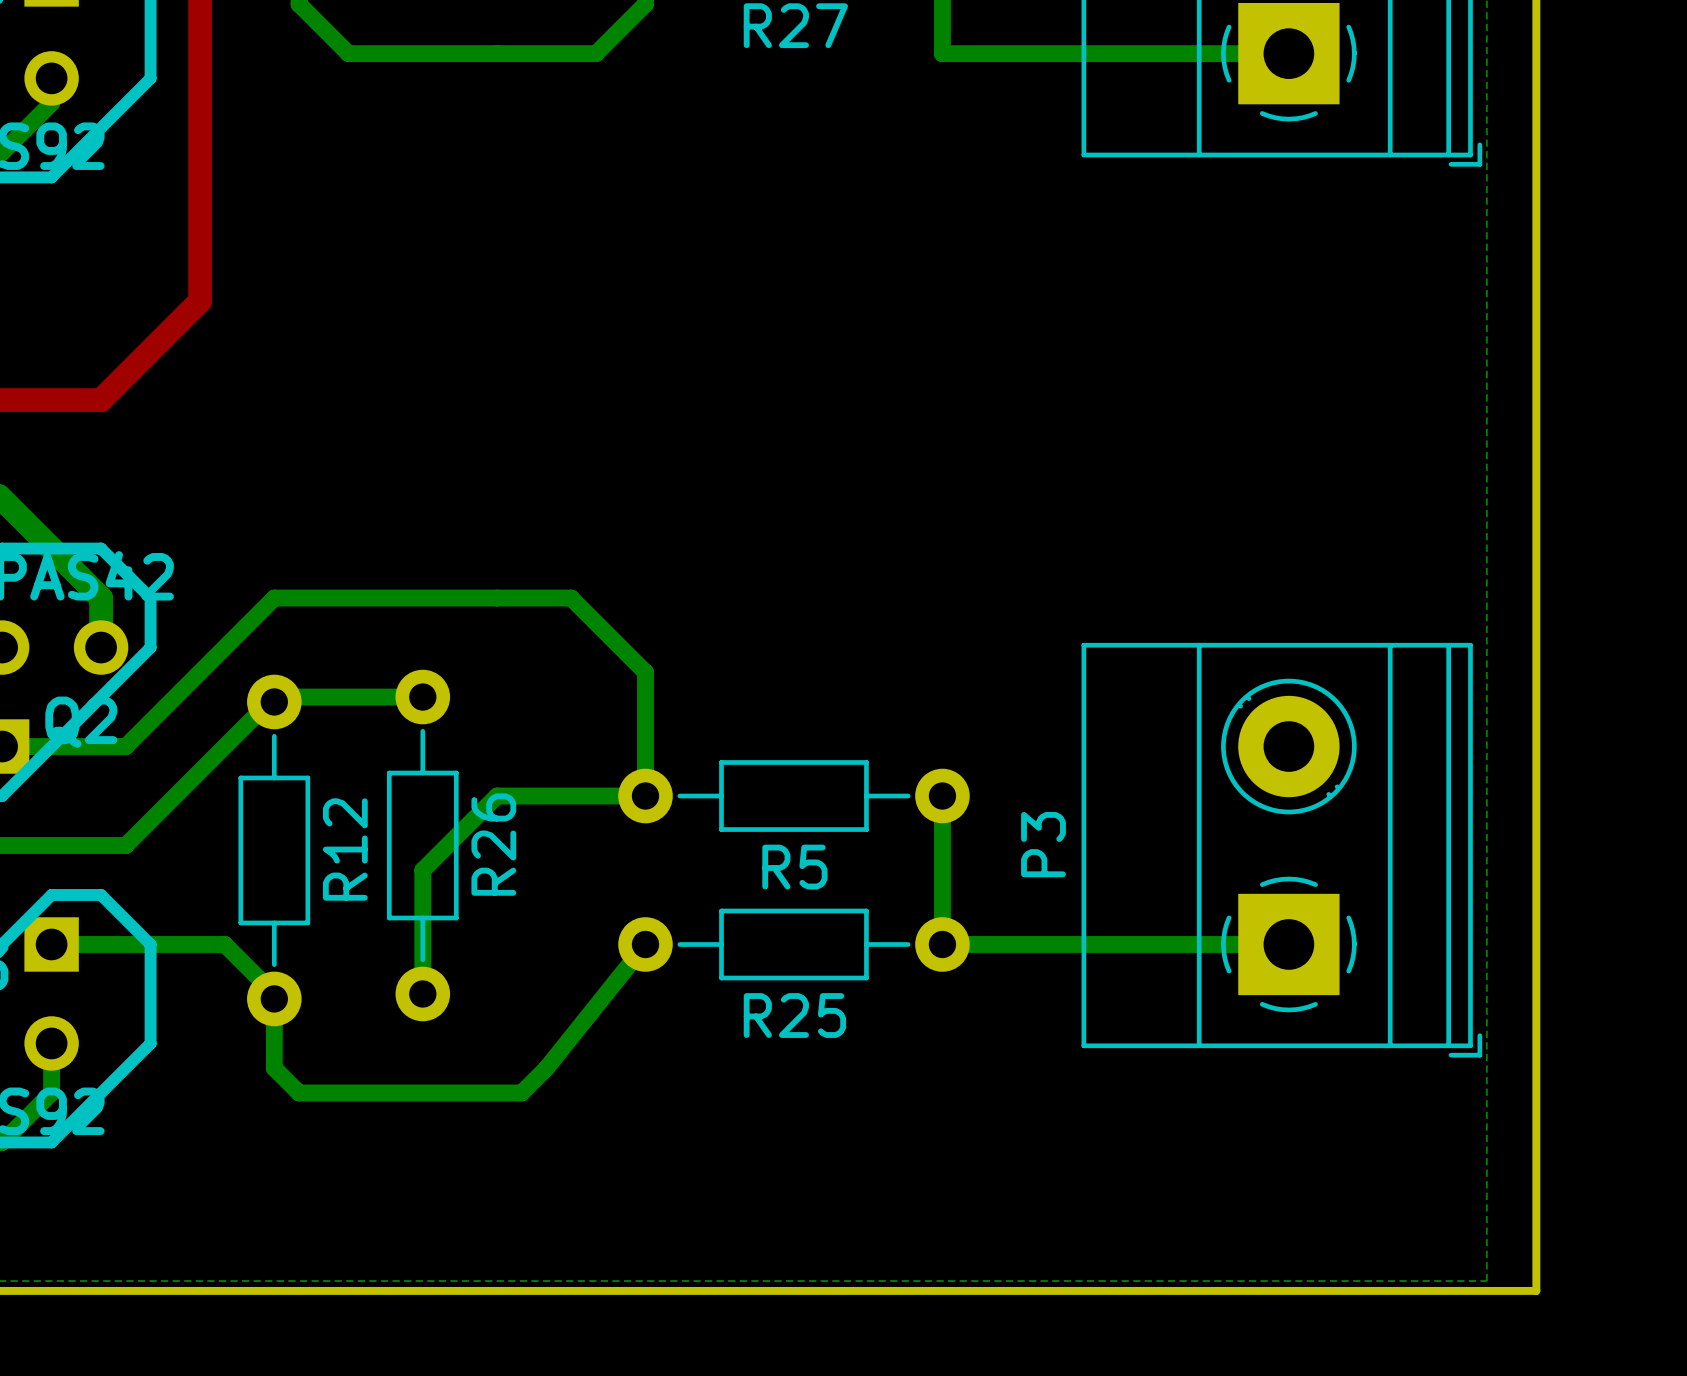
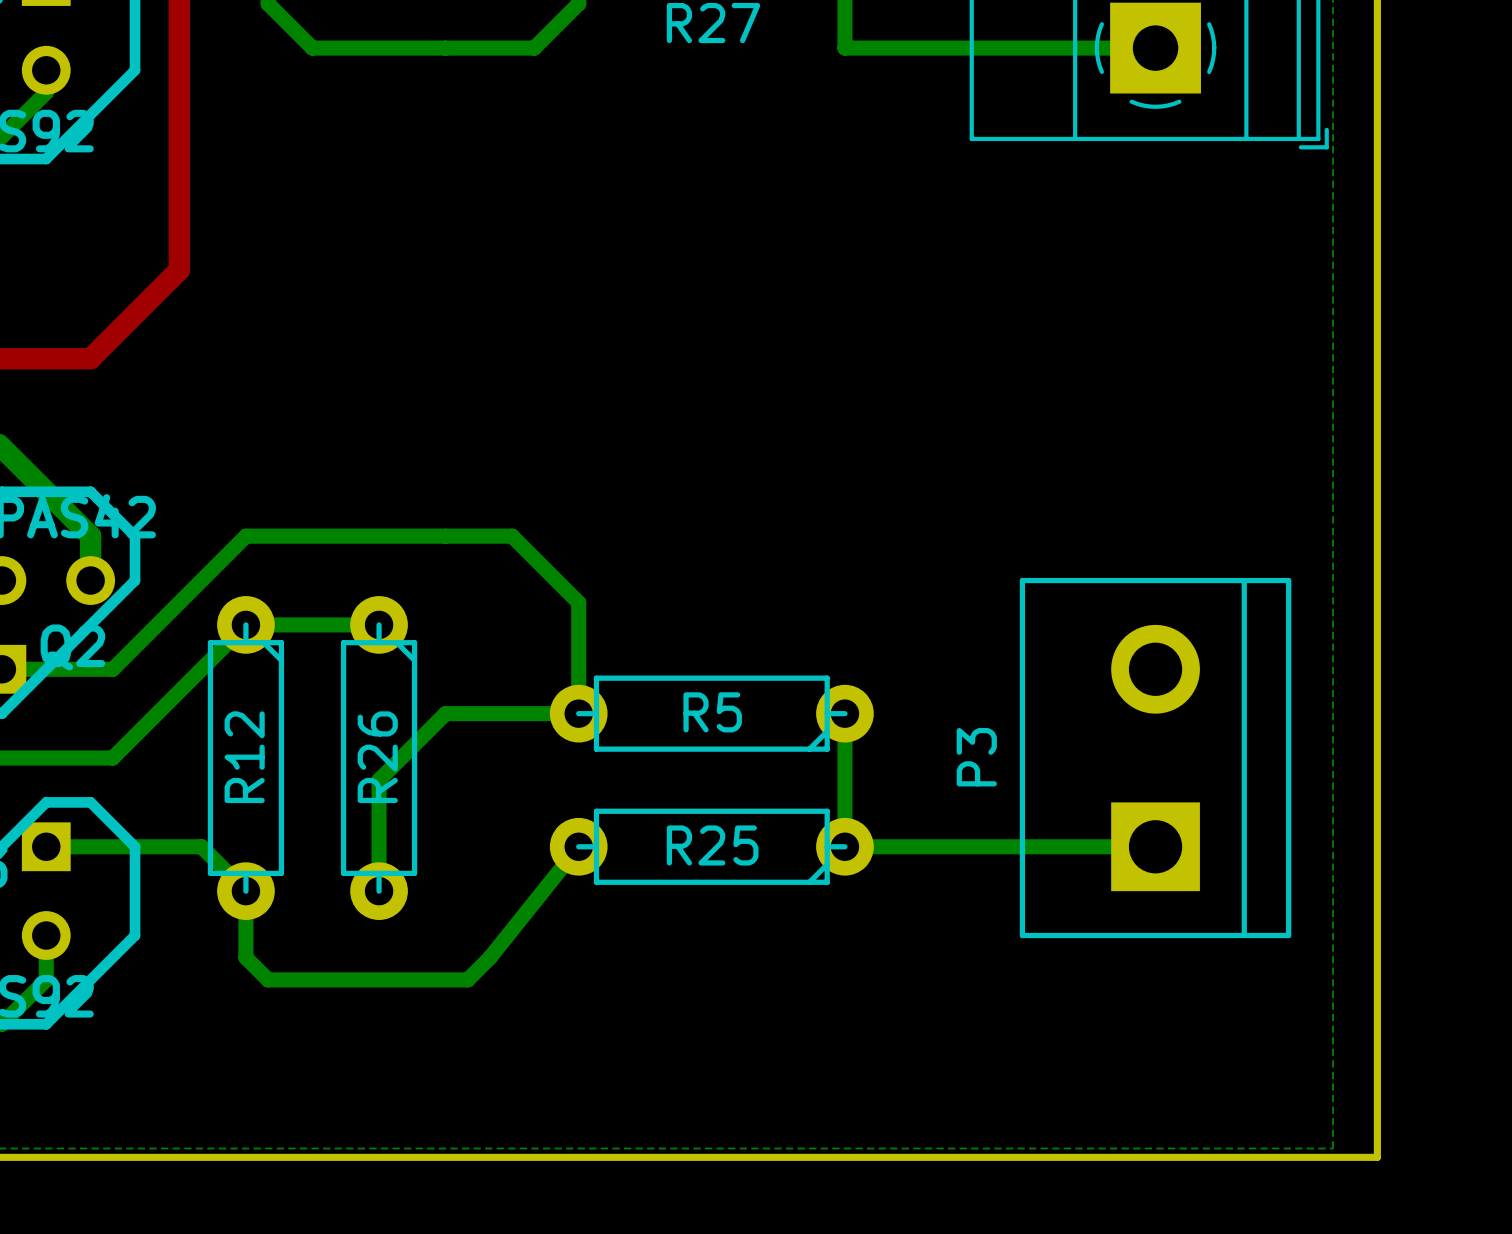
P3 footprint: [1081, 642, 1483, 1058] -> [1019, 577, 1292, 939]
R26 footprint: [386, 669, 459, 1022] -> [340, 596, 418, 920]
R12 footprint: [238, 674, 311, 1027] -> [207, 596, 285, 920]
R5 footprint: [618, 760, 970, 832] -> [549, 675, 874, 752]
R25 footprint: [618, 908, 970, 981] -> [549, 808, 874, 885]

